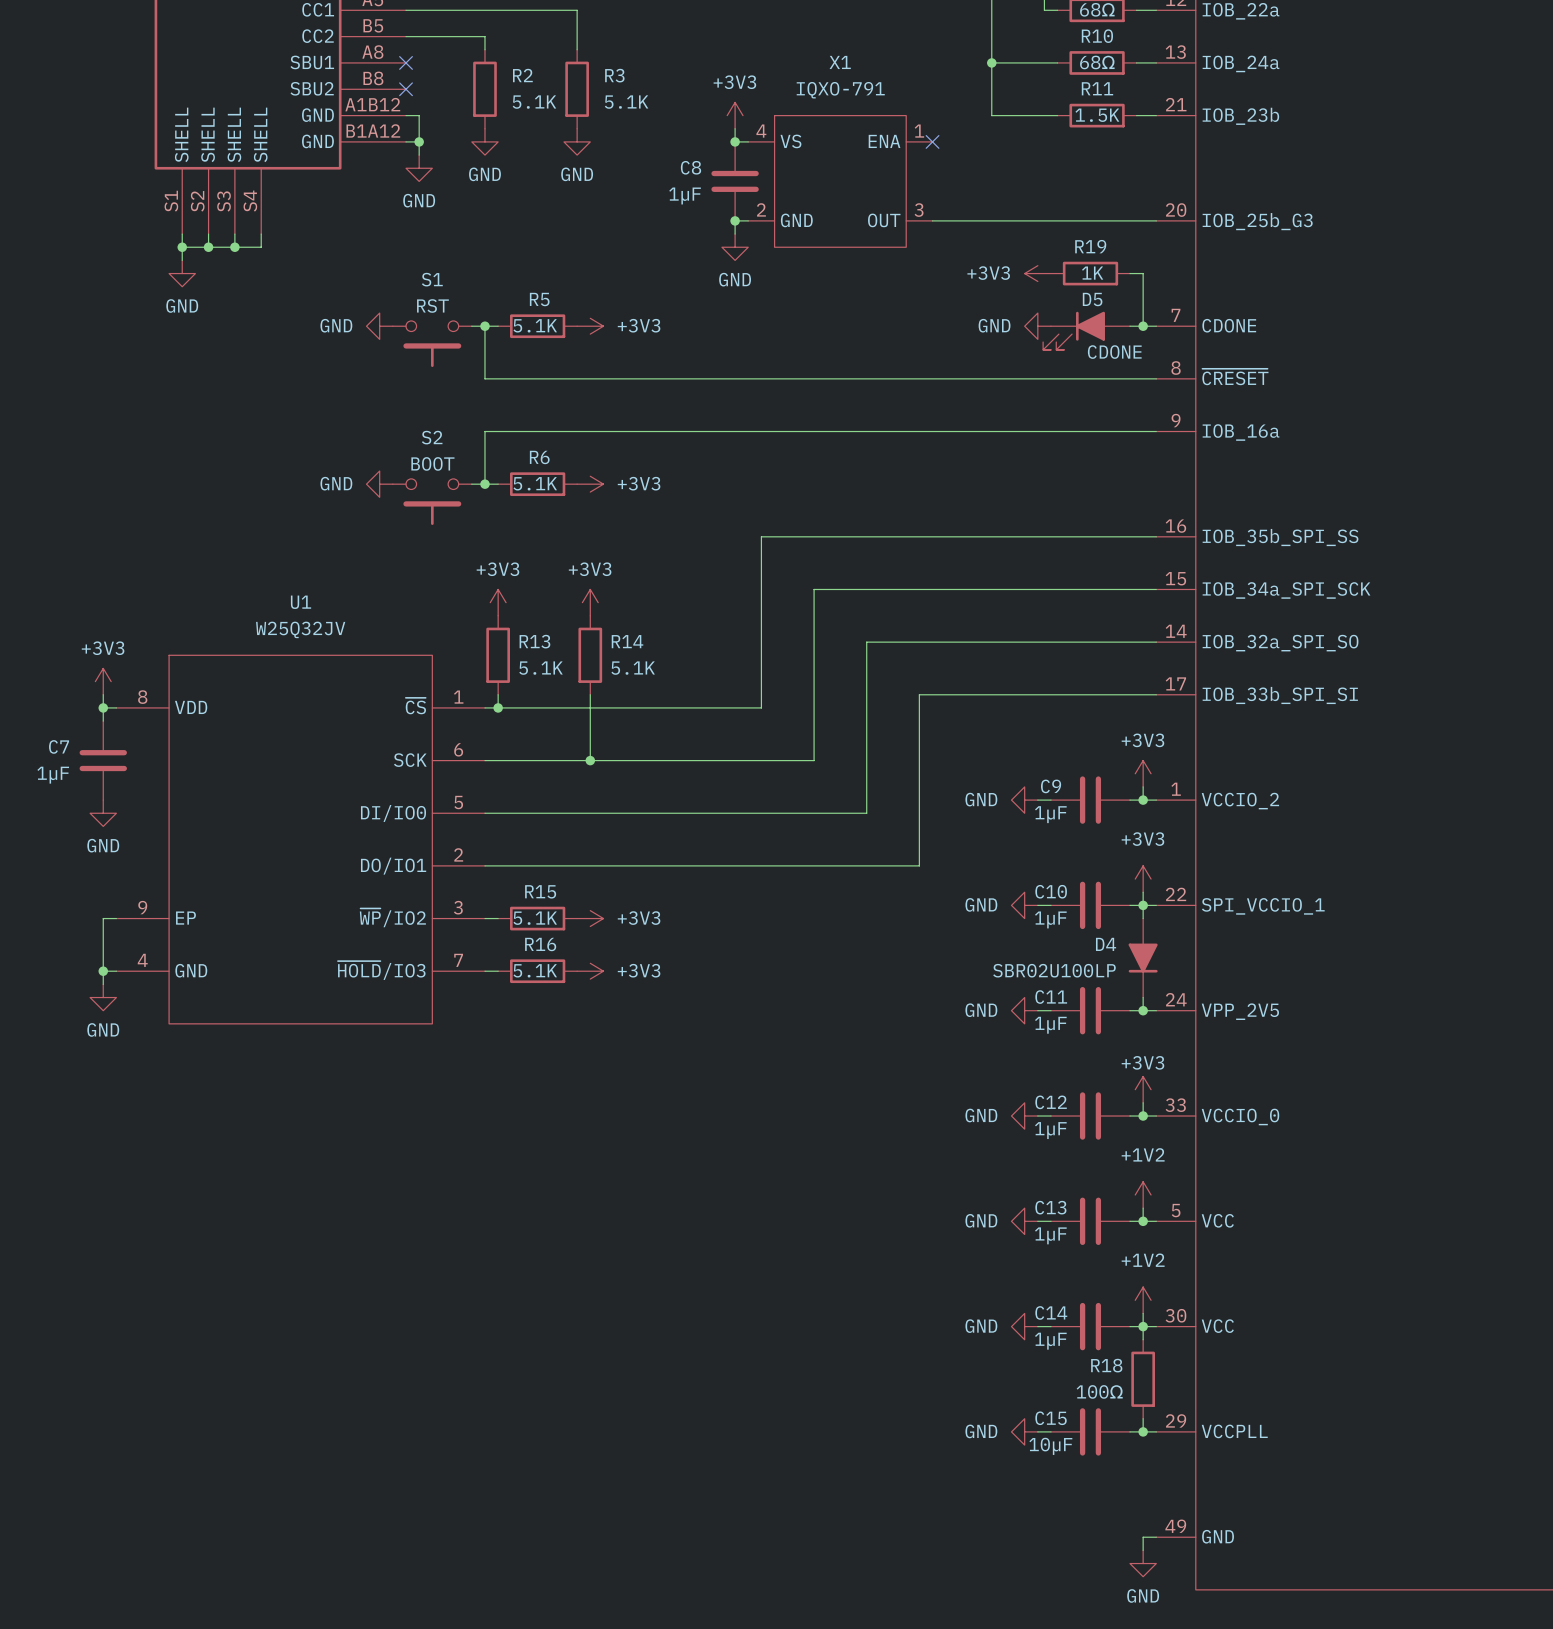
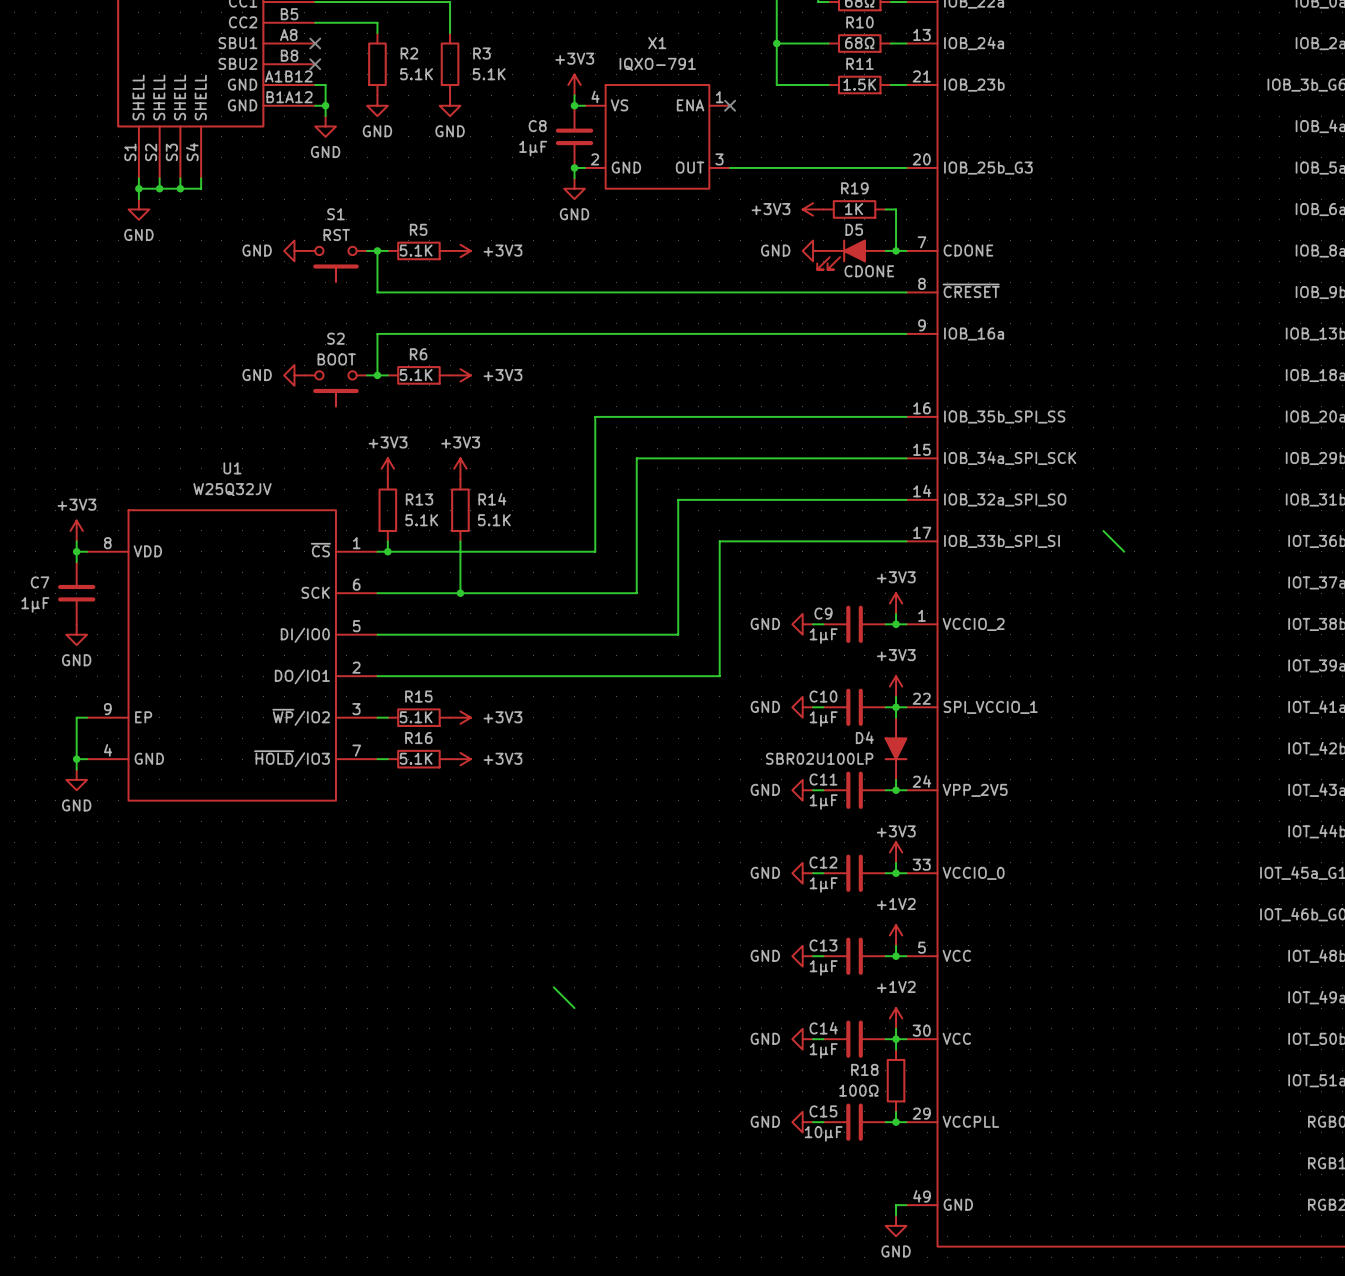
wire: none -> (1103, 530) (1124, 551)
wire: none -> (553, 987) (574, 1008)

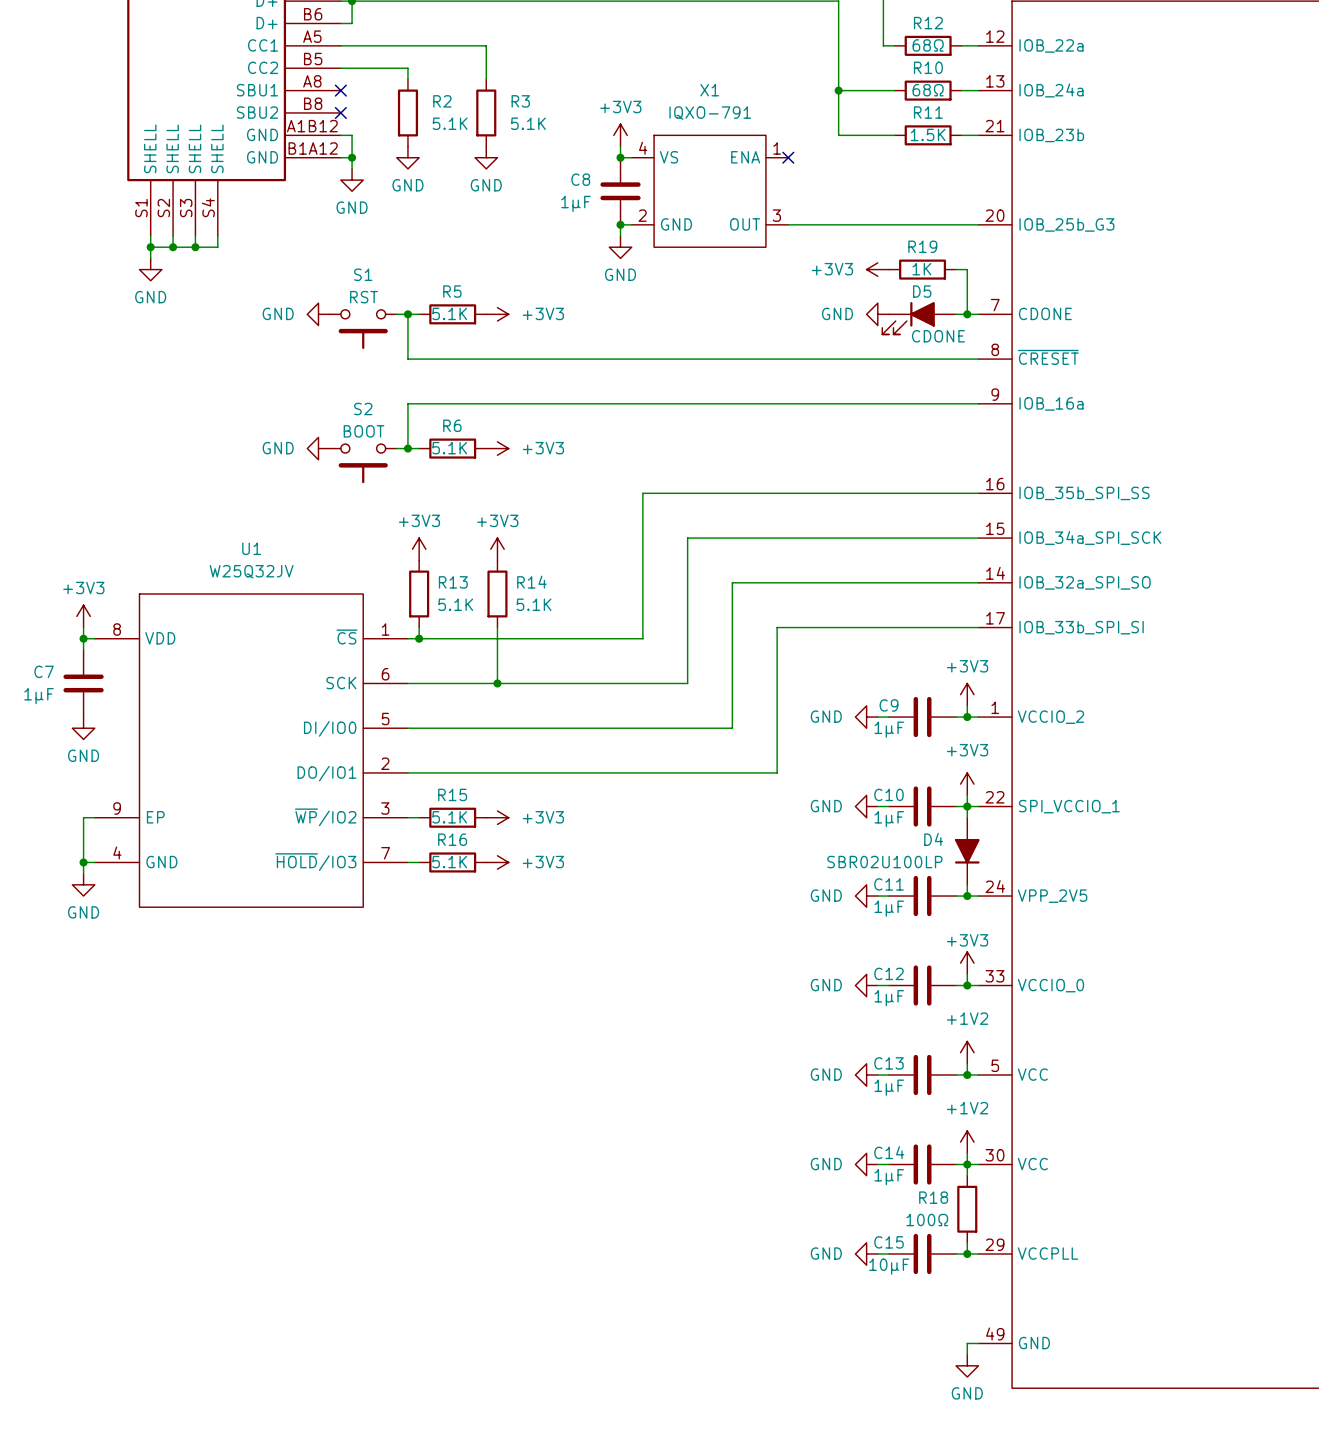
wire: (1103, 530) (1124, 551) -> none
wire: (553, 987) (574, 1008) -> none

